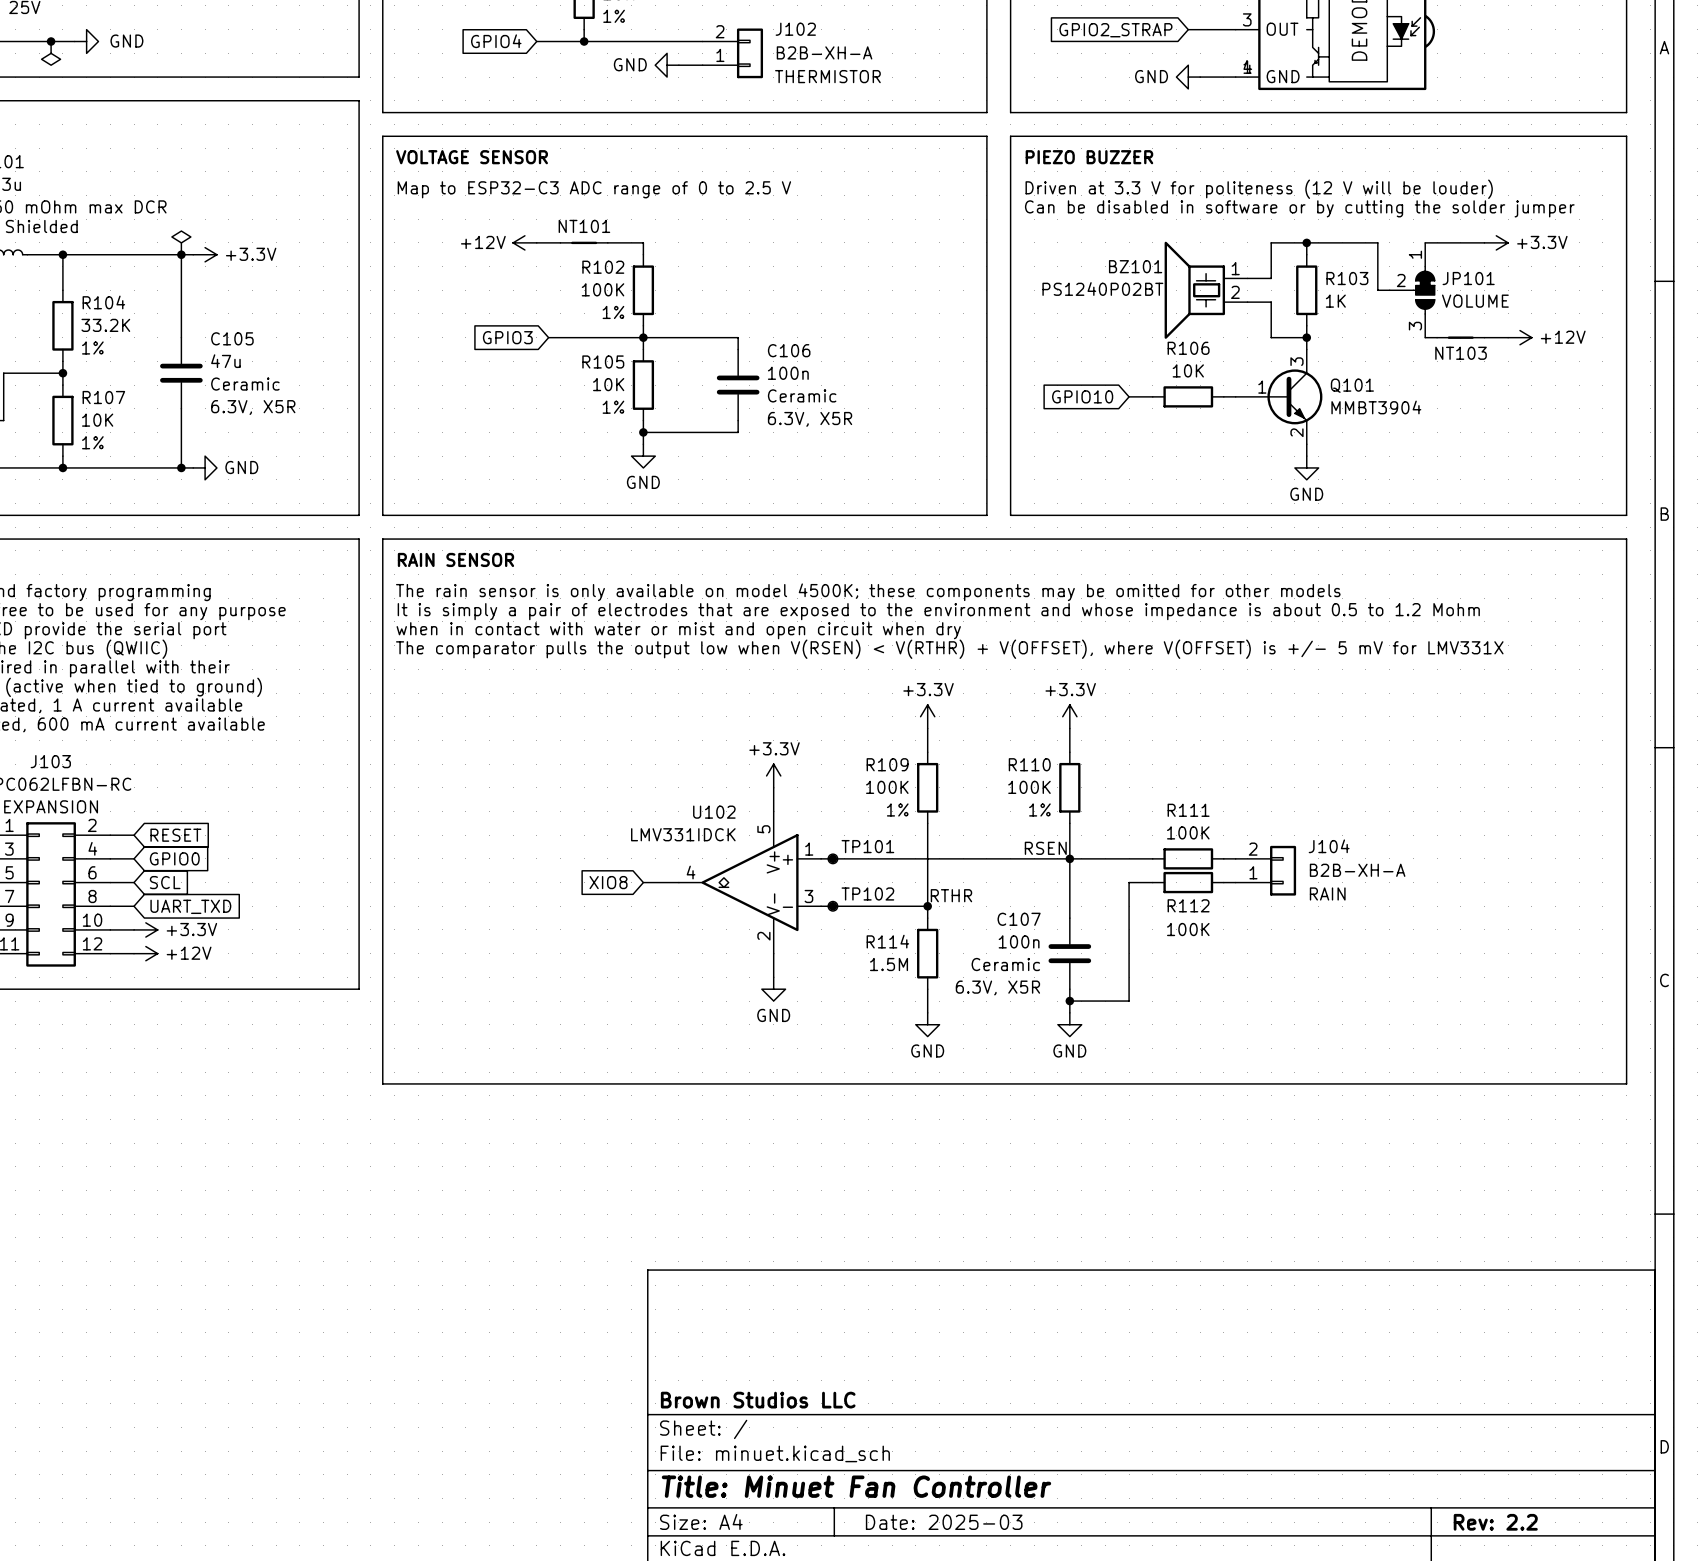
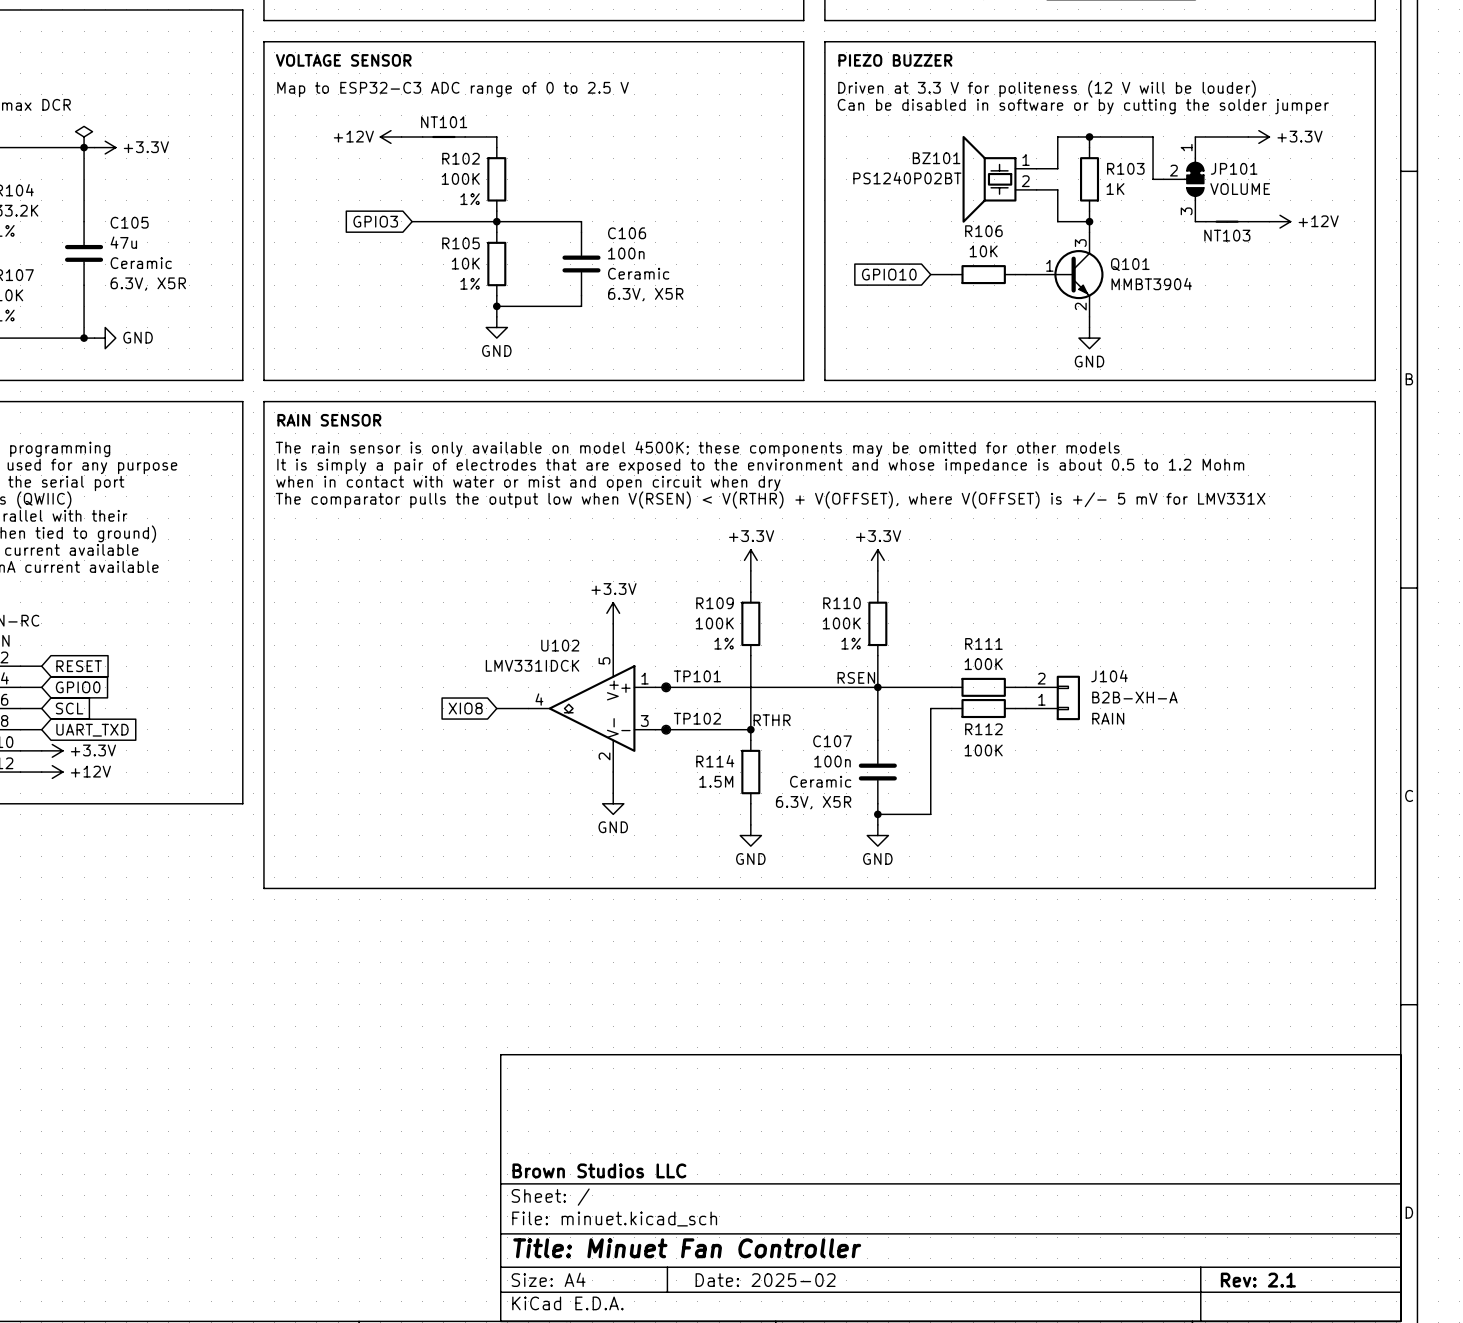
title block: Date: 2025-03 (944, 1522) -> Date: 2025-02 (765, 1280)
title block: Rev: 2.2 (1495, 1522) -> Rev: 2.1 (1258, 1280)

